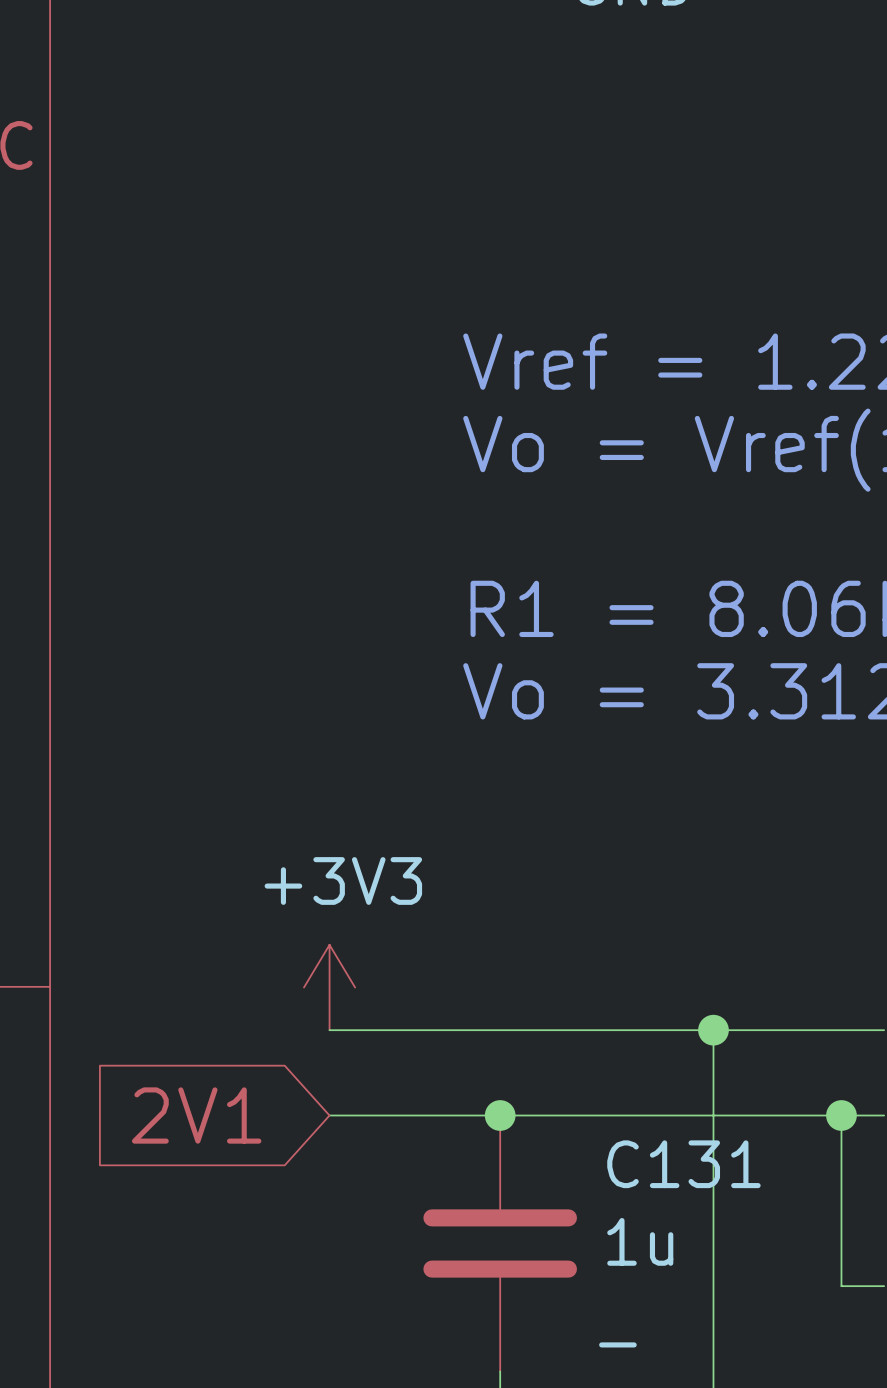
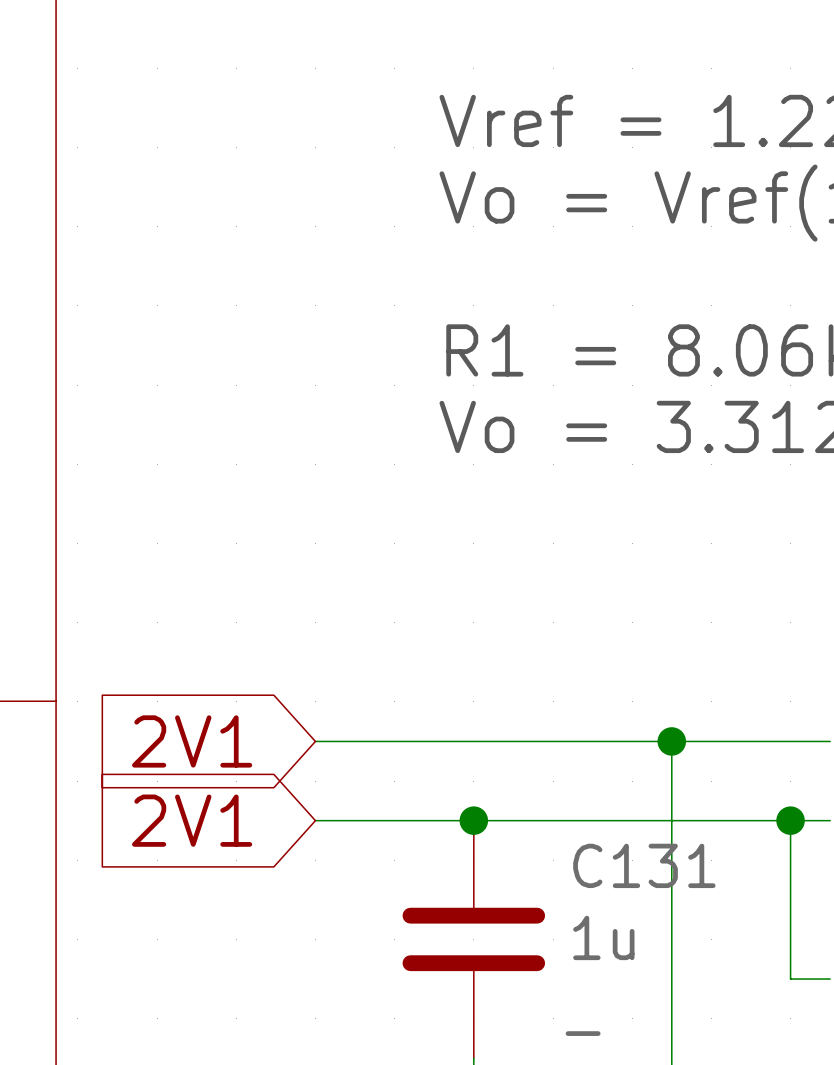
power symbol: +3V3 (329, 987) -> none
global label: none -> 2V1 (192, 741)

